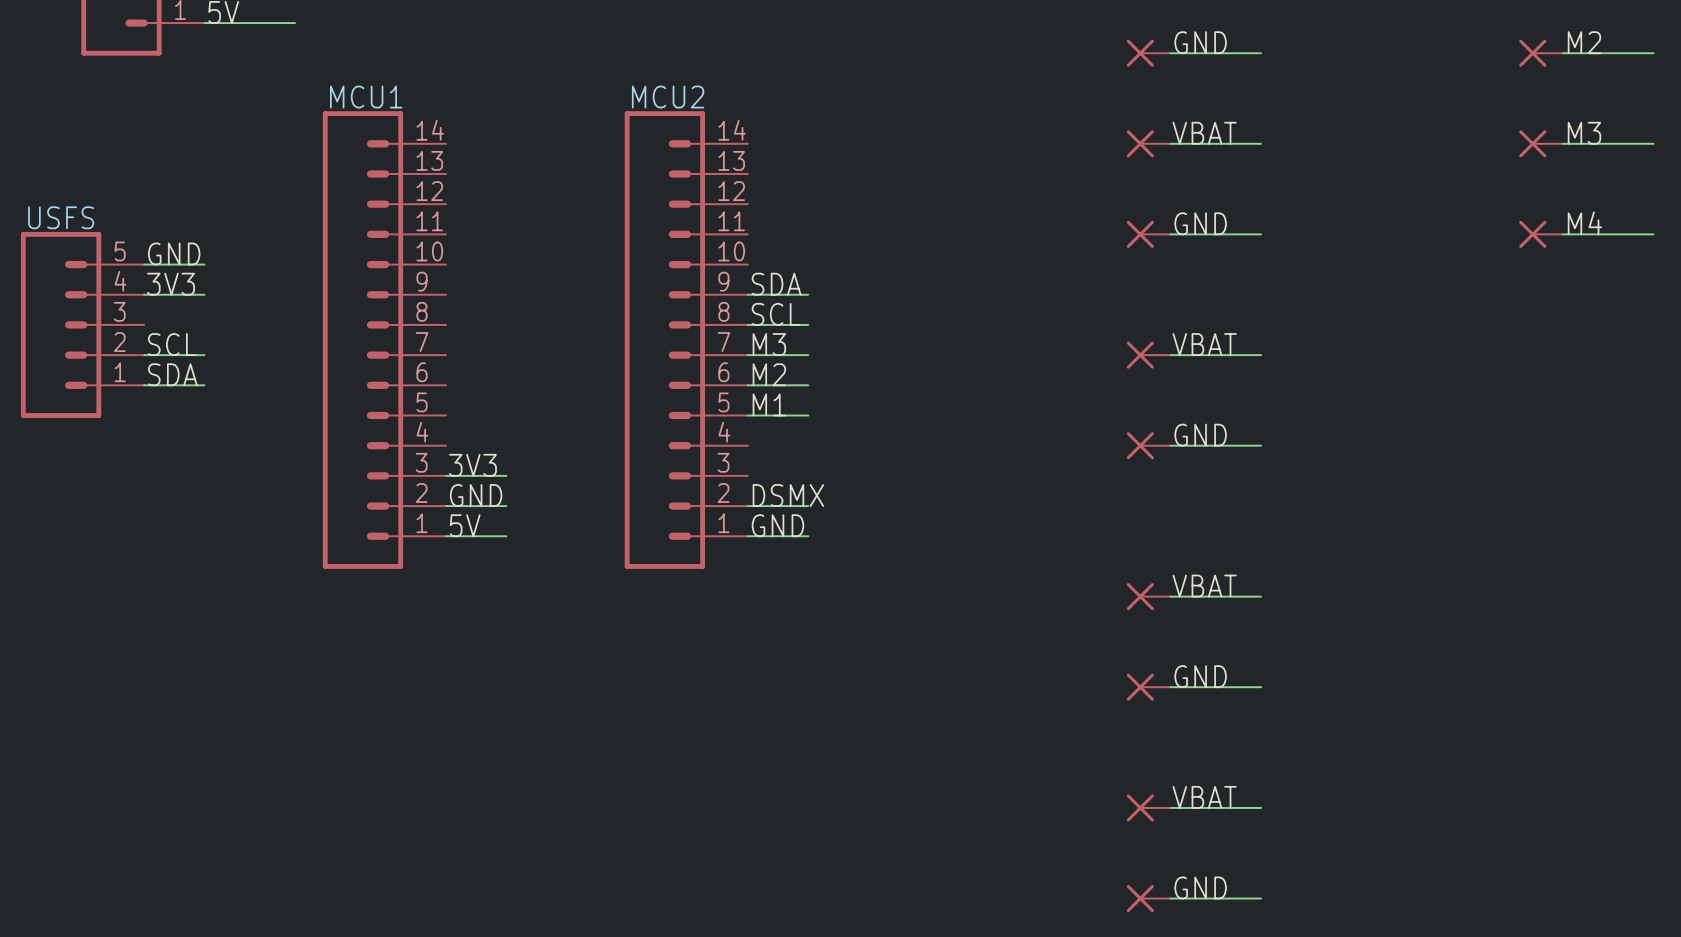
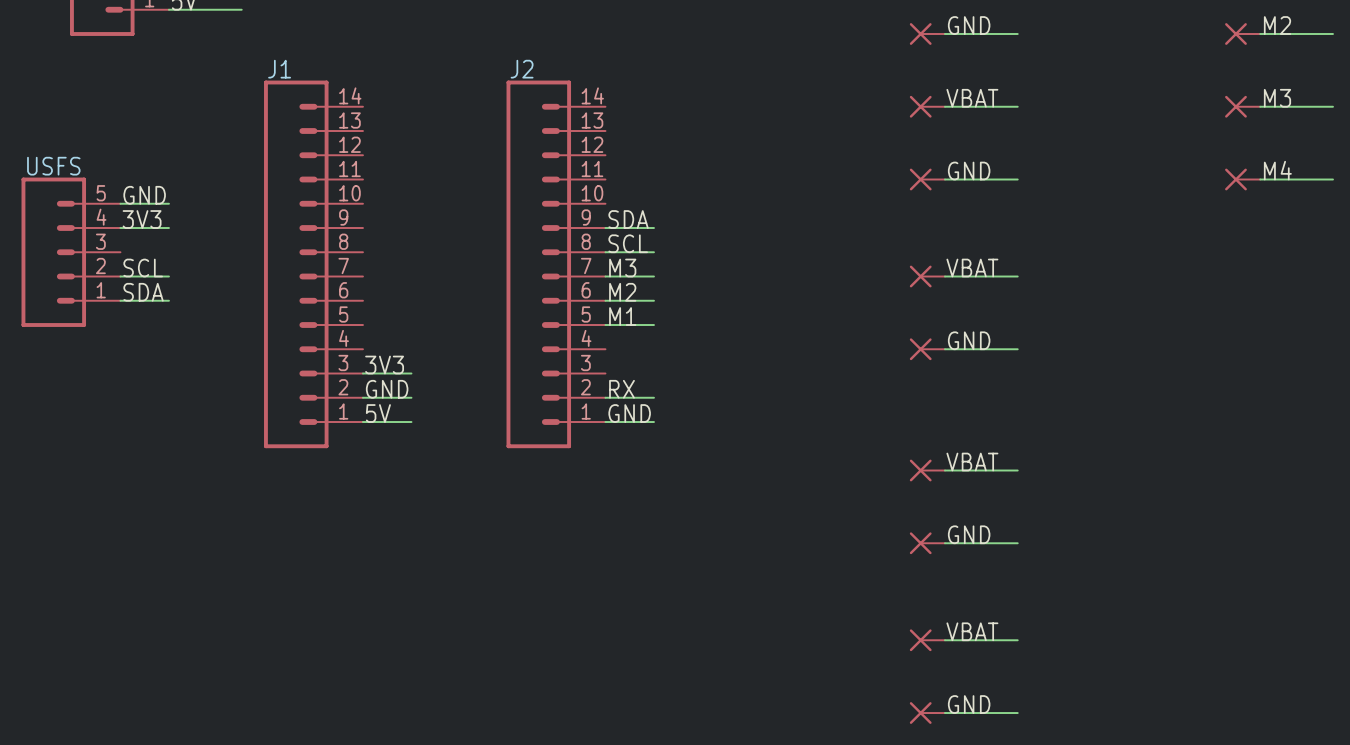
MCU1 name: MCU1 (366, 97) -> J1 (279, 69)
MCU2 name: MCU2 (668, 97) -> J2 (522, 69)
label: DSMX (788, 495) -> RX (622, 389)

